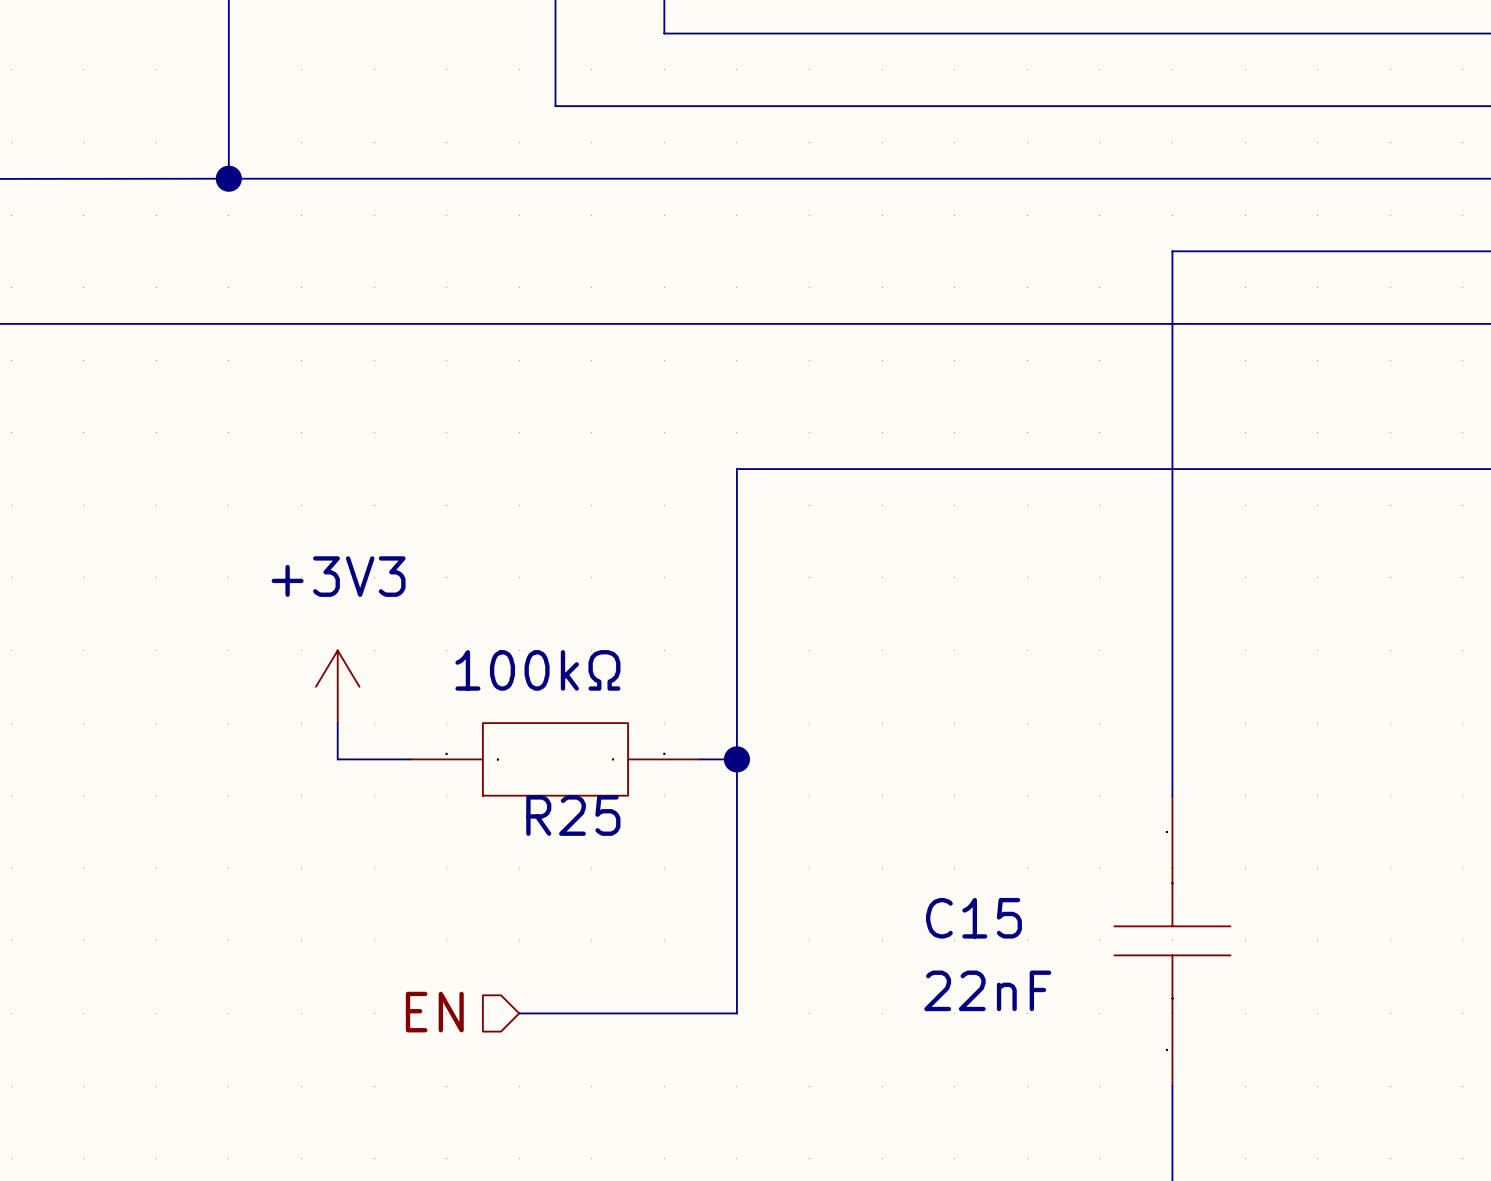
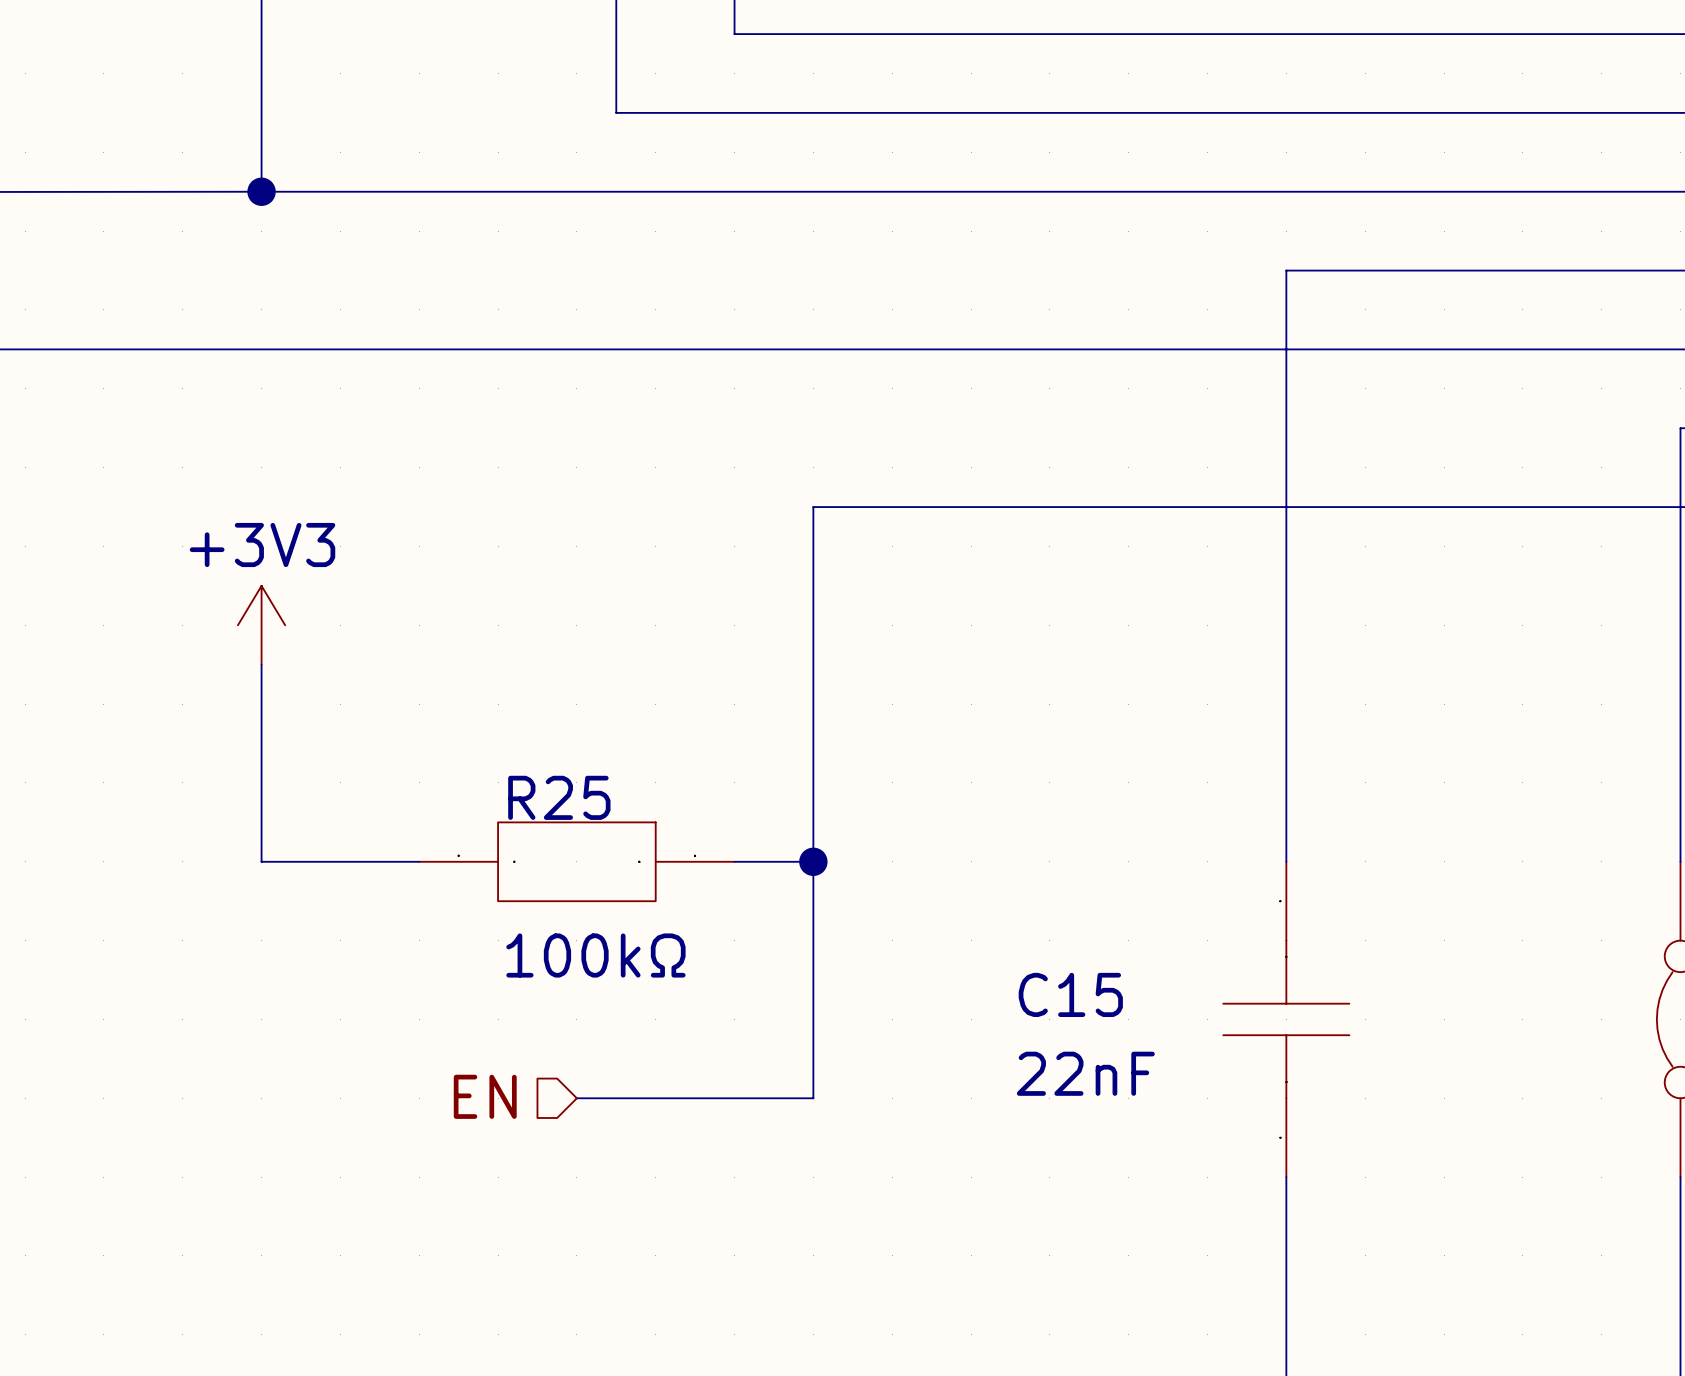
power symbol text position: +3V3 (338, 576) -> +3V3 (262, 545)
wire: none -> (261, 664) (261, 861) (419, 861)
power symbol position: +3V3 (337, 686) -> +3V3 (261, 625)
wire: (337, 723) (337, 759) (410, 759) -> none
R25 rotation: 0° (555, 759) -> 180° (576, 861)
wire: (700, 759) (736, 759) -> none
junction position: (736, 759) -> (813, 861)
wire: none -> (734, 861) (813, 861)

